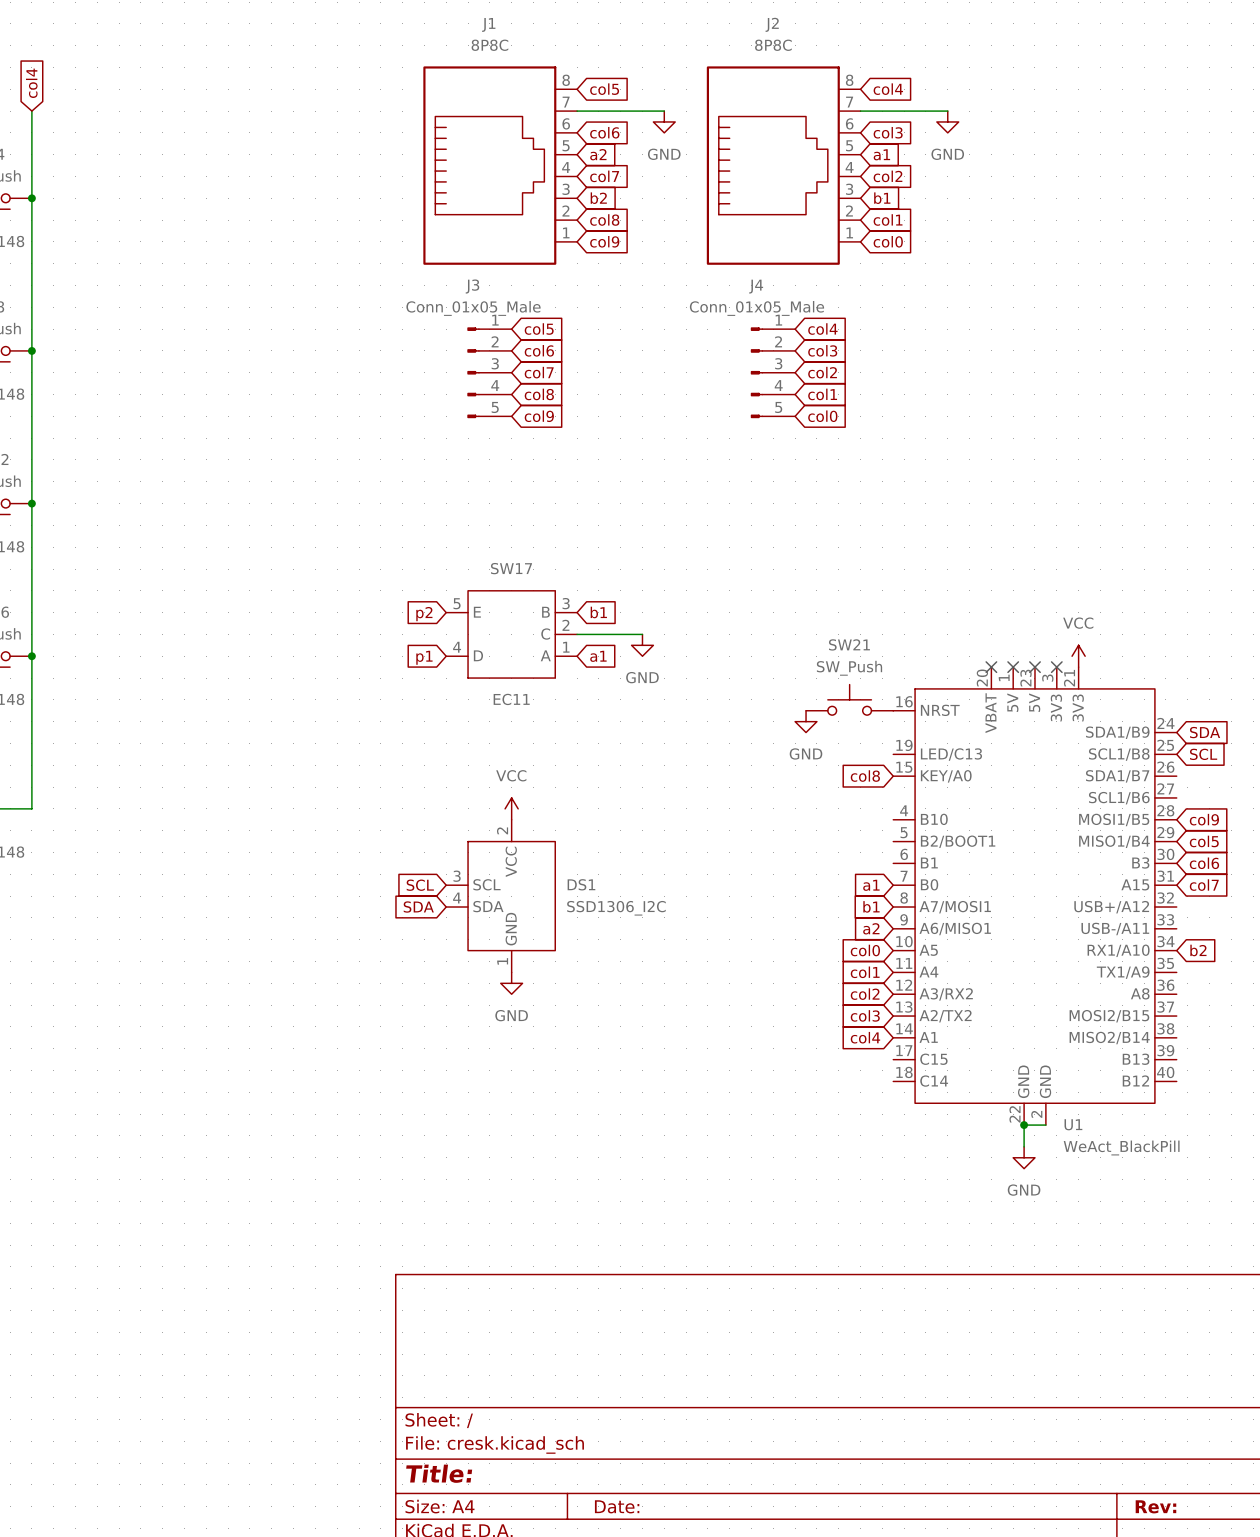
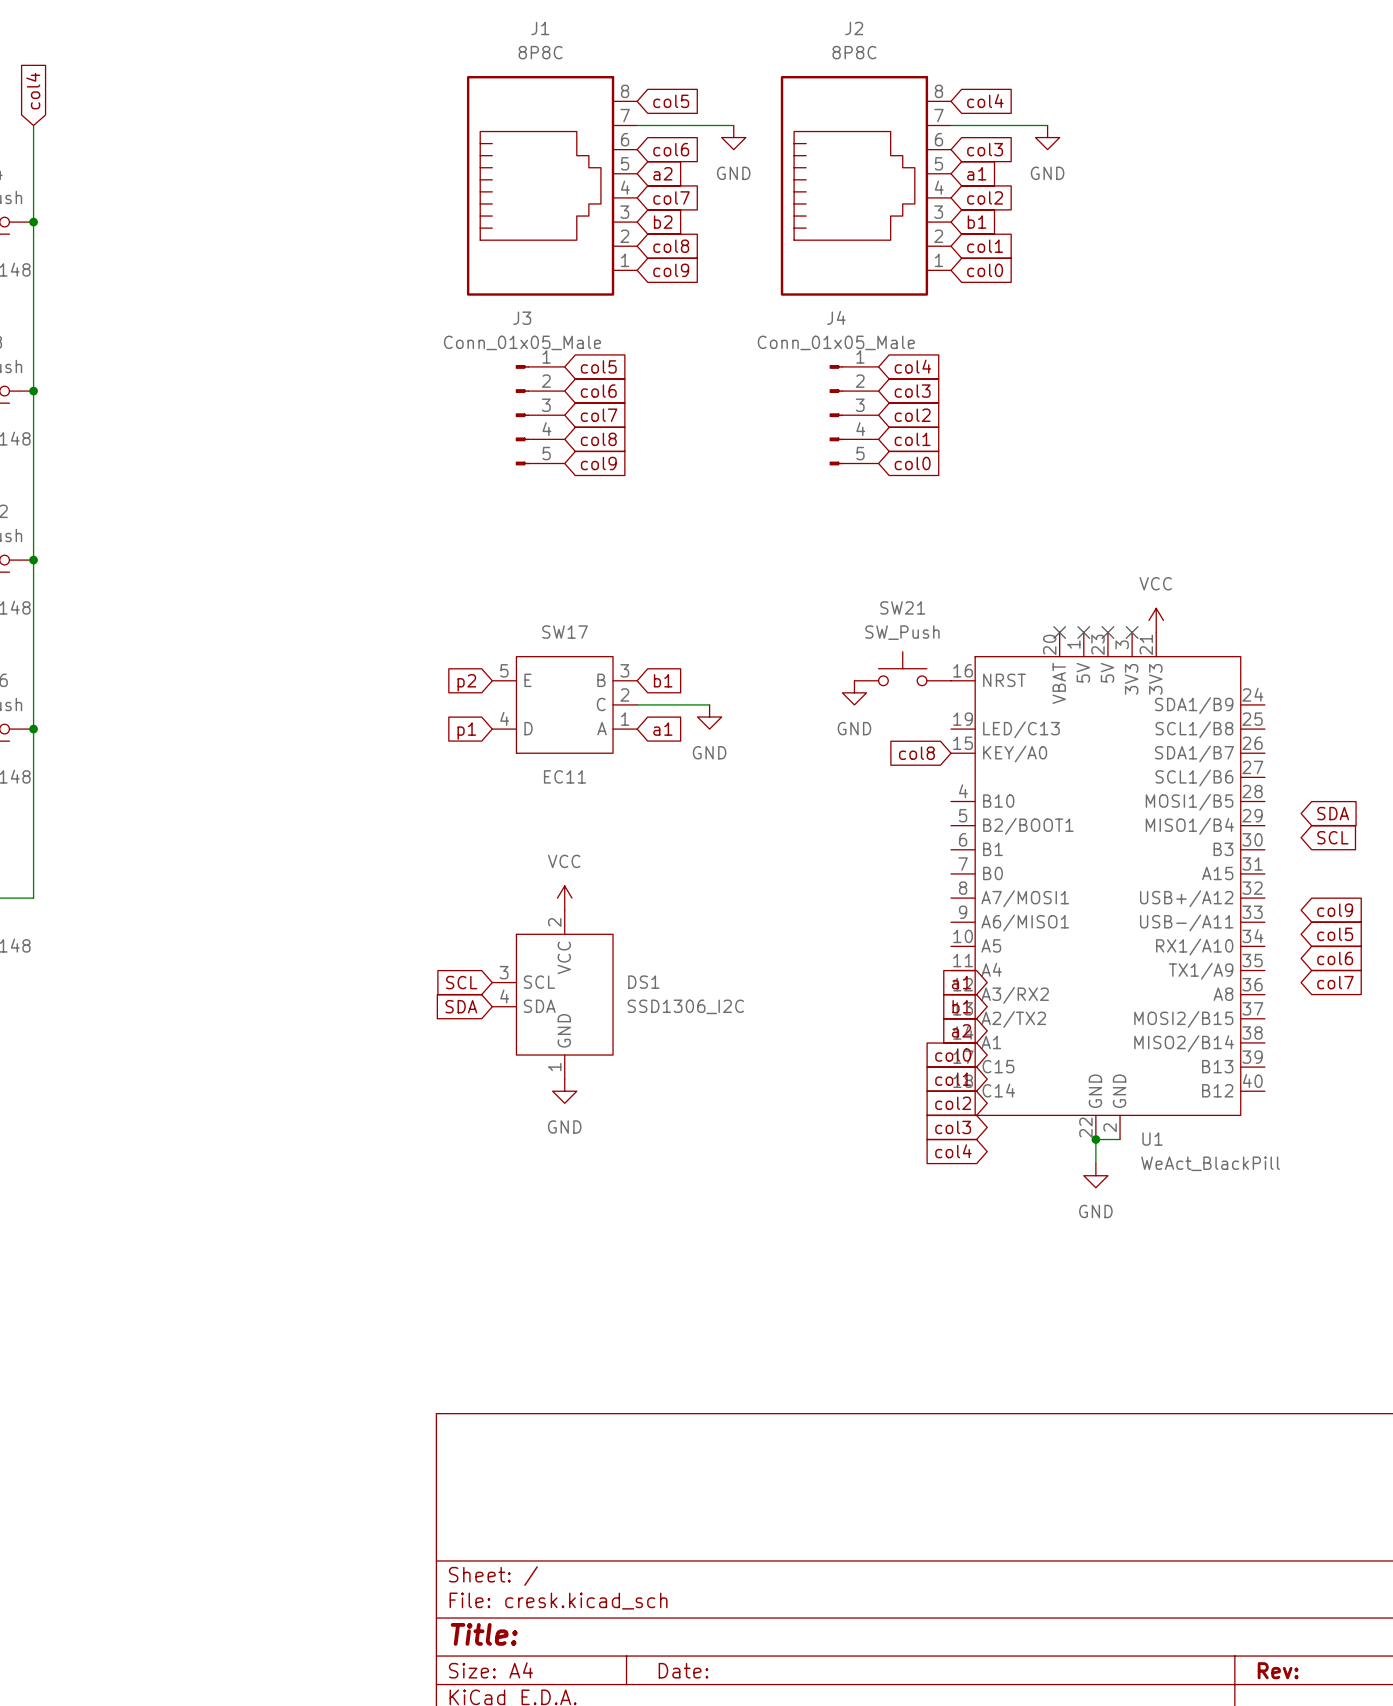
no-connect mark: none -> (1059, 632)
no-connect mark: none -> (1083, 632)
no-connect mark: none -> (1107, 632)
no-connect mark: none -> (1132, 632)
power symbol position: VCC (1078, 656) -> VCC (1156, 620)
no-connect mark: (991, 667) -> none
no-connect mark: (1013, 667) -> none
no-connect mark: (1034, 667) -> none
no-connect mark: (1056, 667) -> none
SW21 position: (849, 699) -> (902, 668)
power symbol position: GND (806, 721) -> GND (854, 692)
global label position: col8 (865, 776) -> col8 (916, 753)
U1 position: (1034, 896) -> (1107, 886)
global label: b2 (1198, 950) -> none
junction: none -> (1095, 1139)
junction: (1024, 1125) -> none
wire: (1045, 1125) (1024, 1125) (1024, 1146) -> (1120, 1139) (1095, 1139) (1095, 1163)
power symbol position: GND (1024, 1157) -> GND (1095, 1175)

